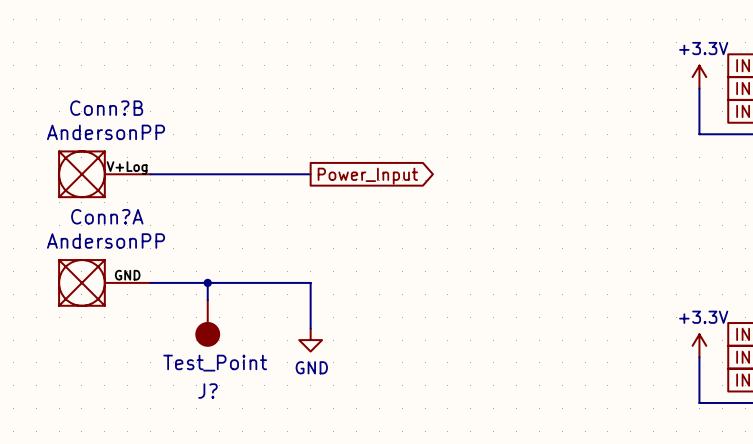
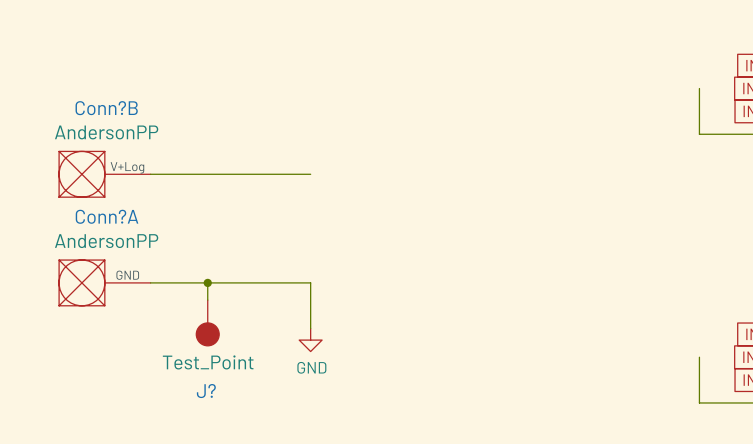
power symbol: +3.3V (699, 77) -> none
global label: Power_Input (367, 176) -> none
power symbol: +3.3V (699, 345) -> none

